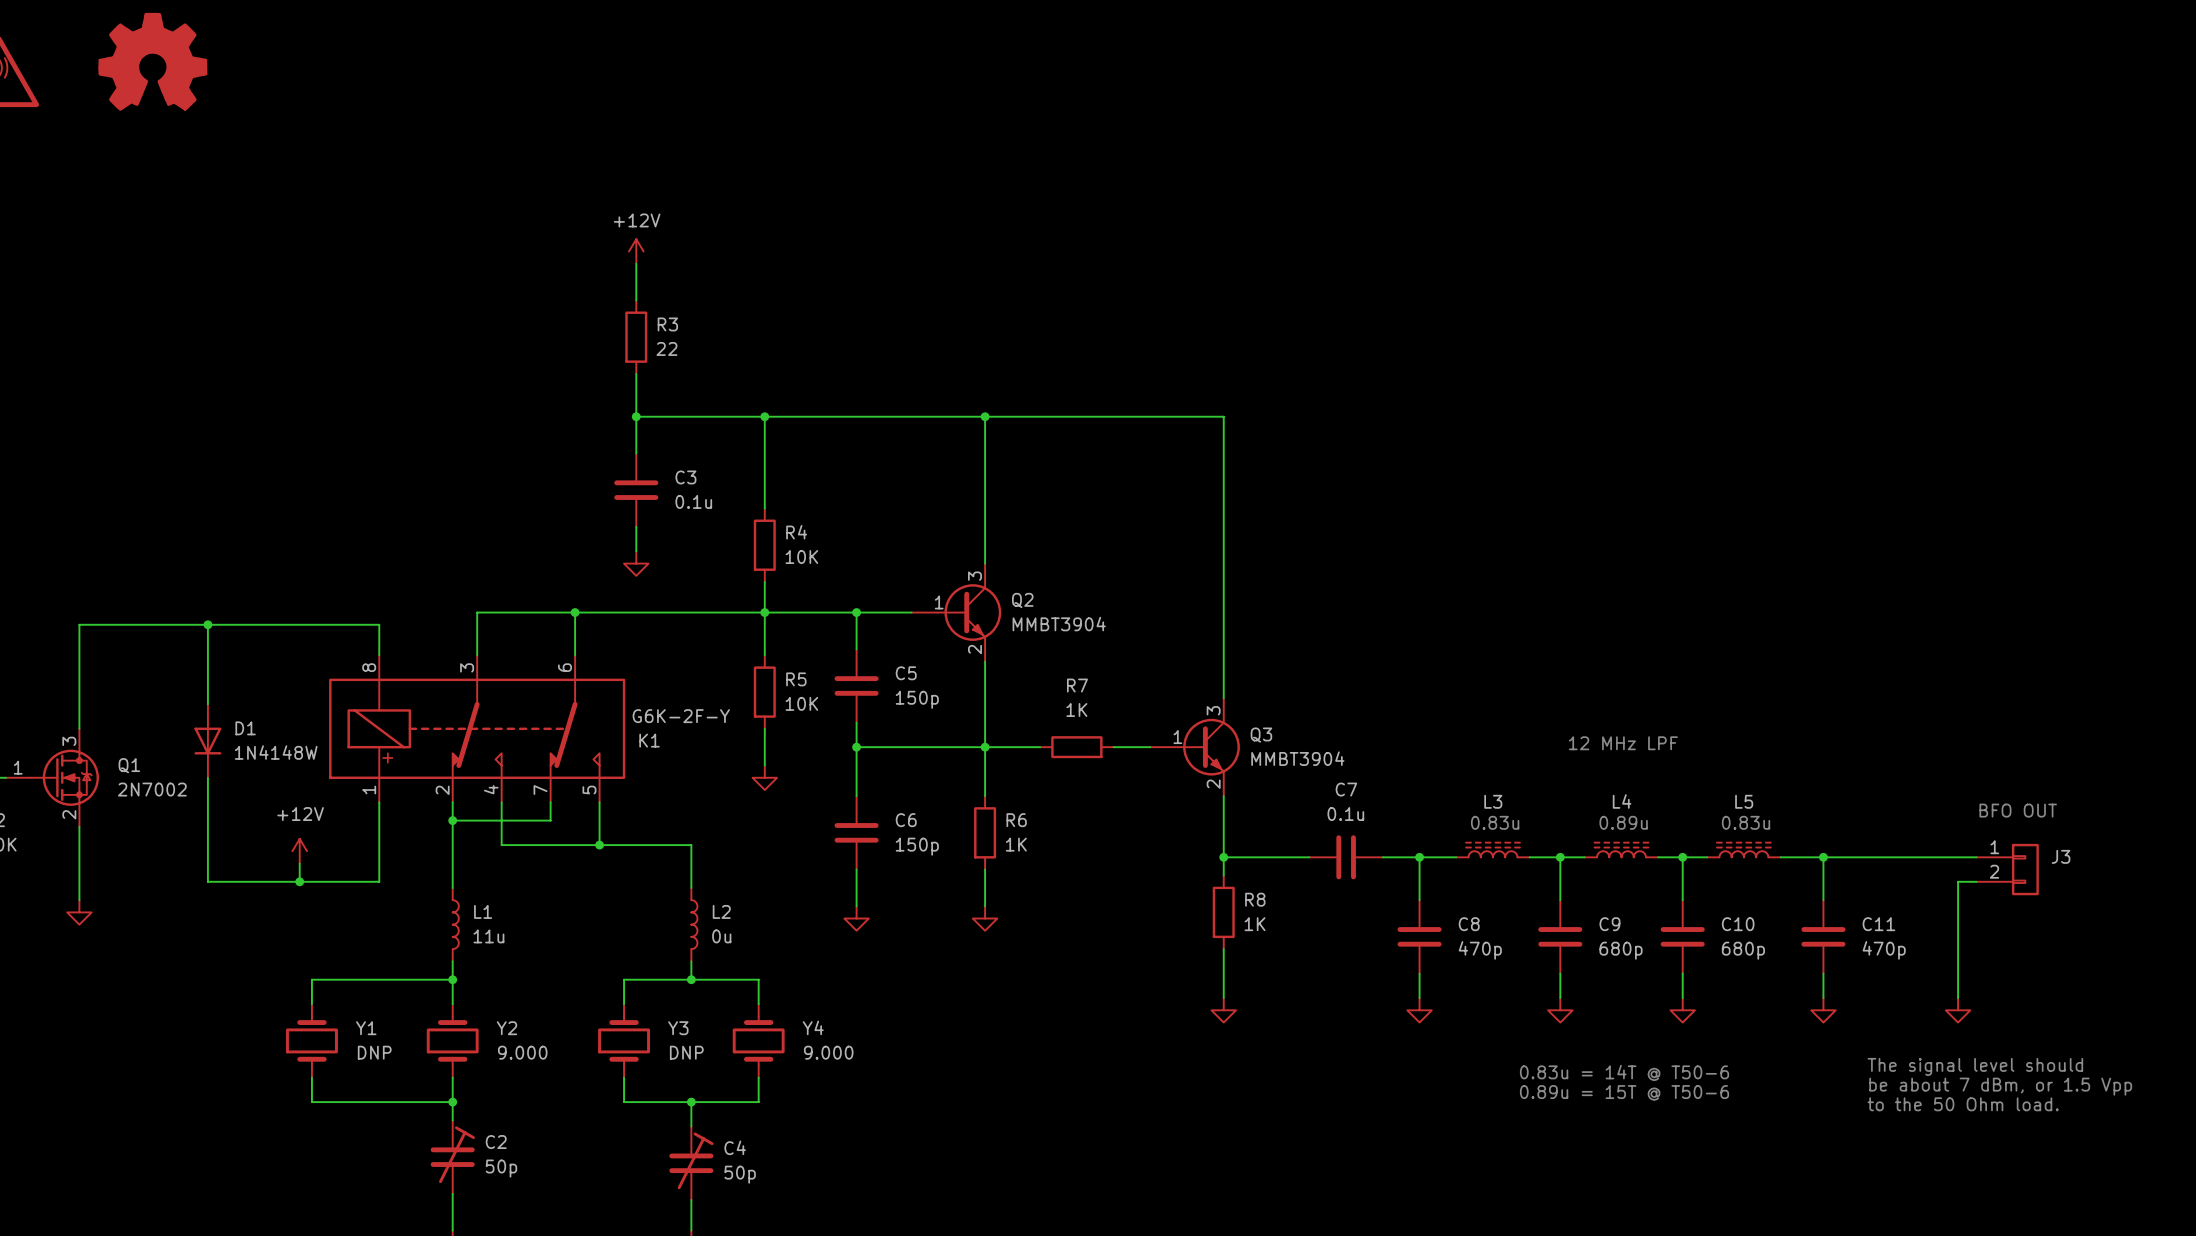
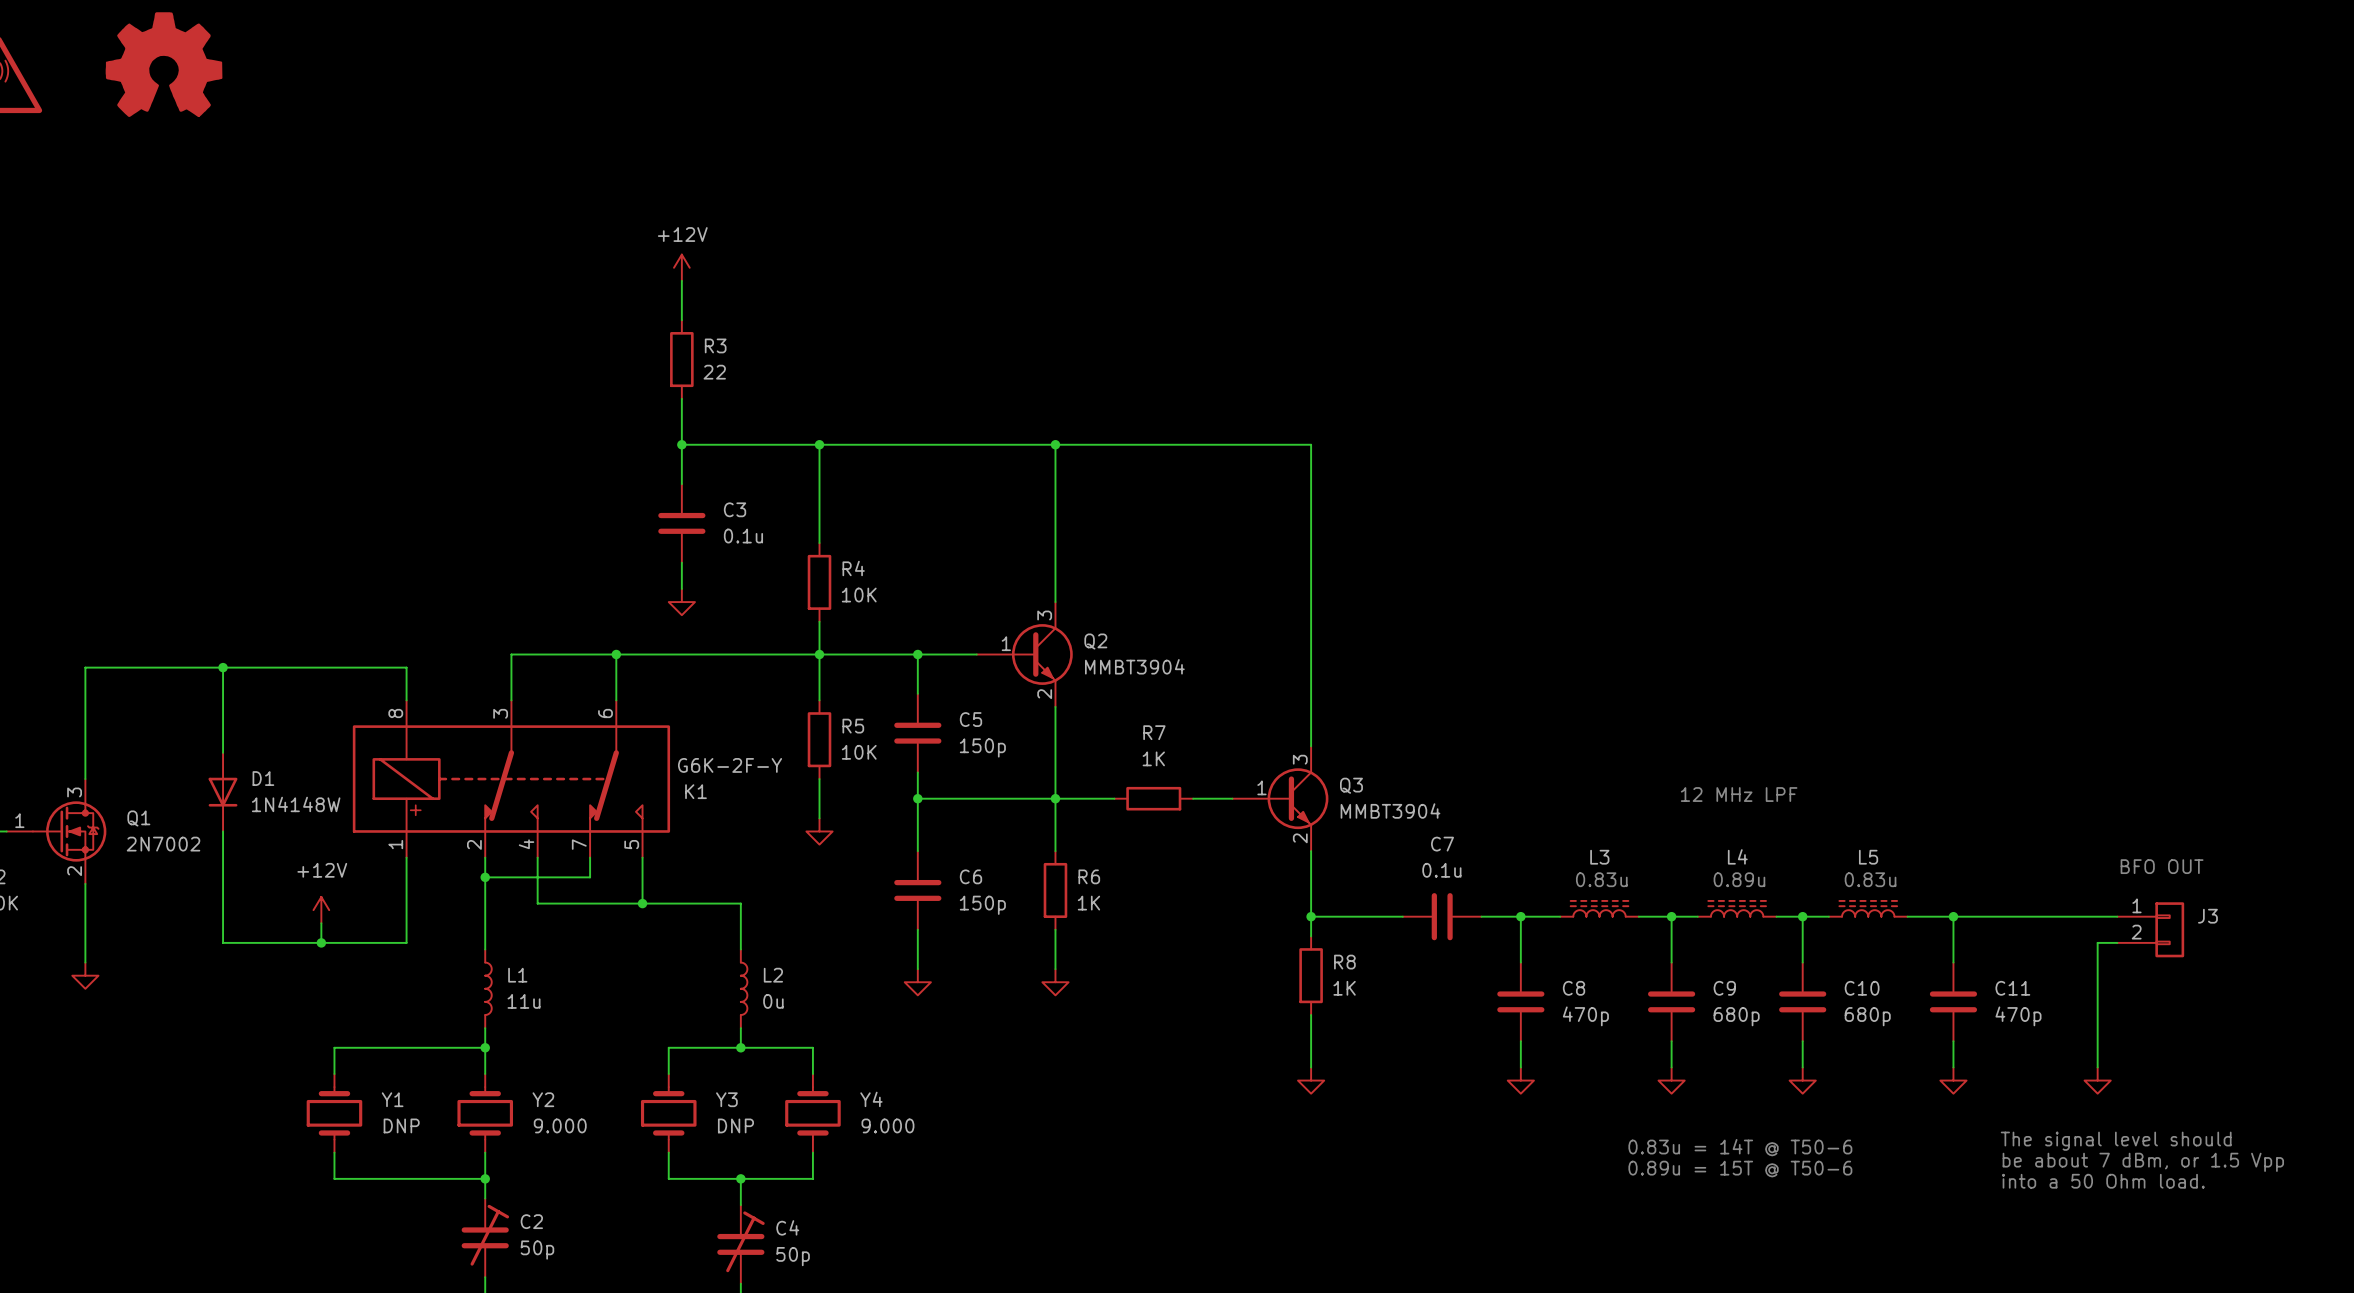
text: to the 50 Ohm load. (1963, 1104) -> into a 50 Ohm load. (2103, 1181)

